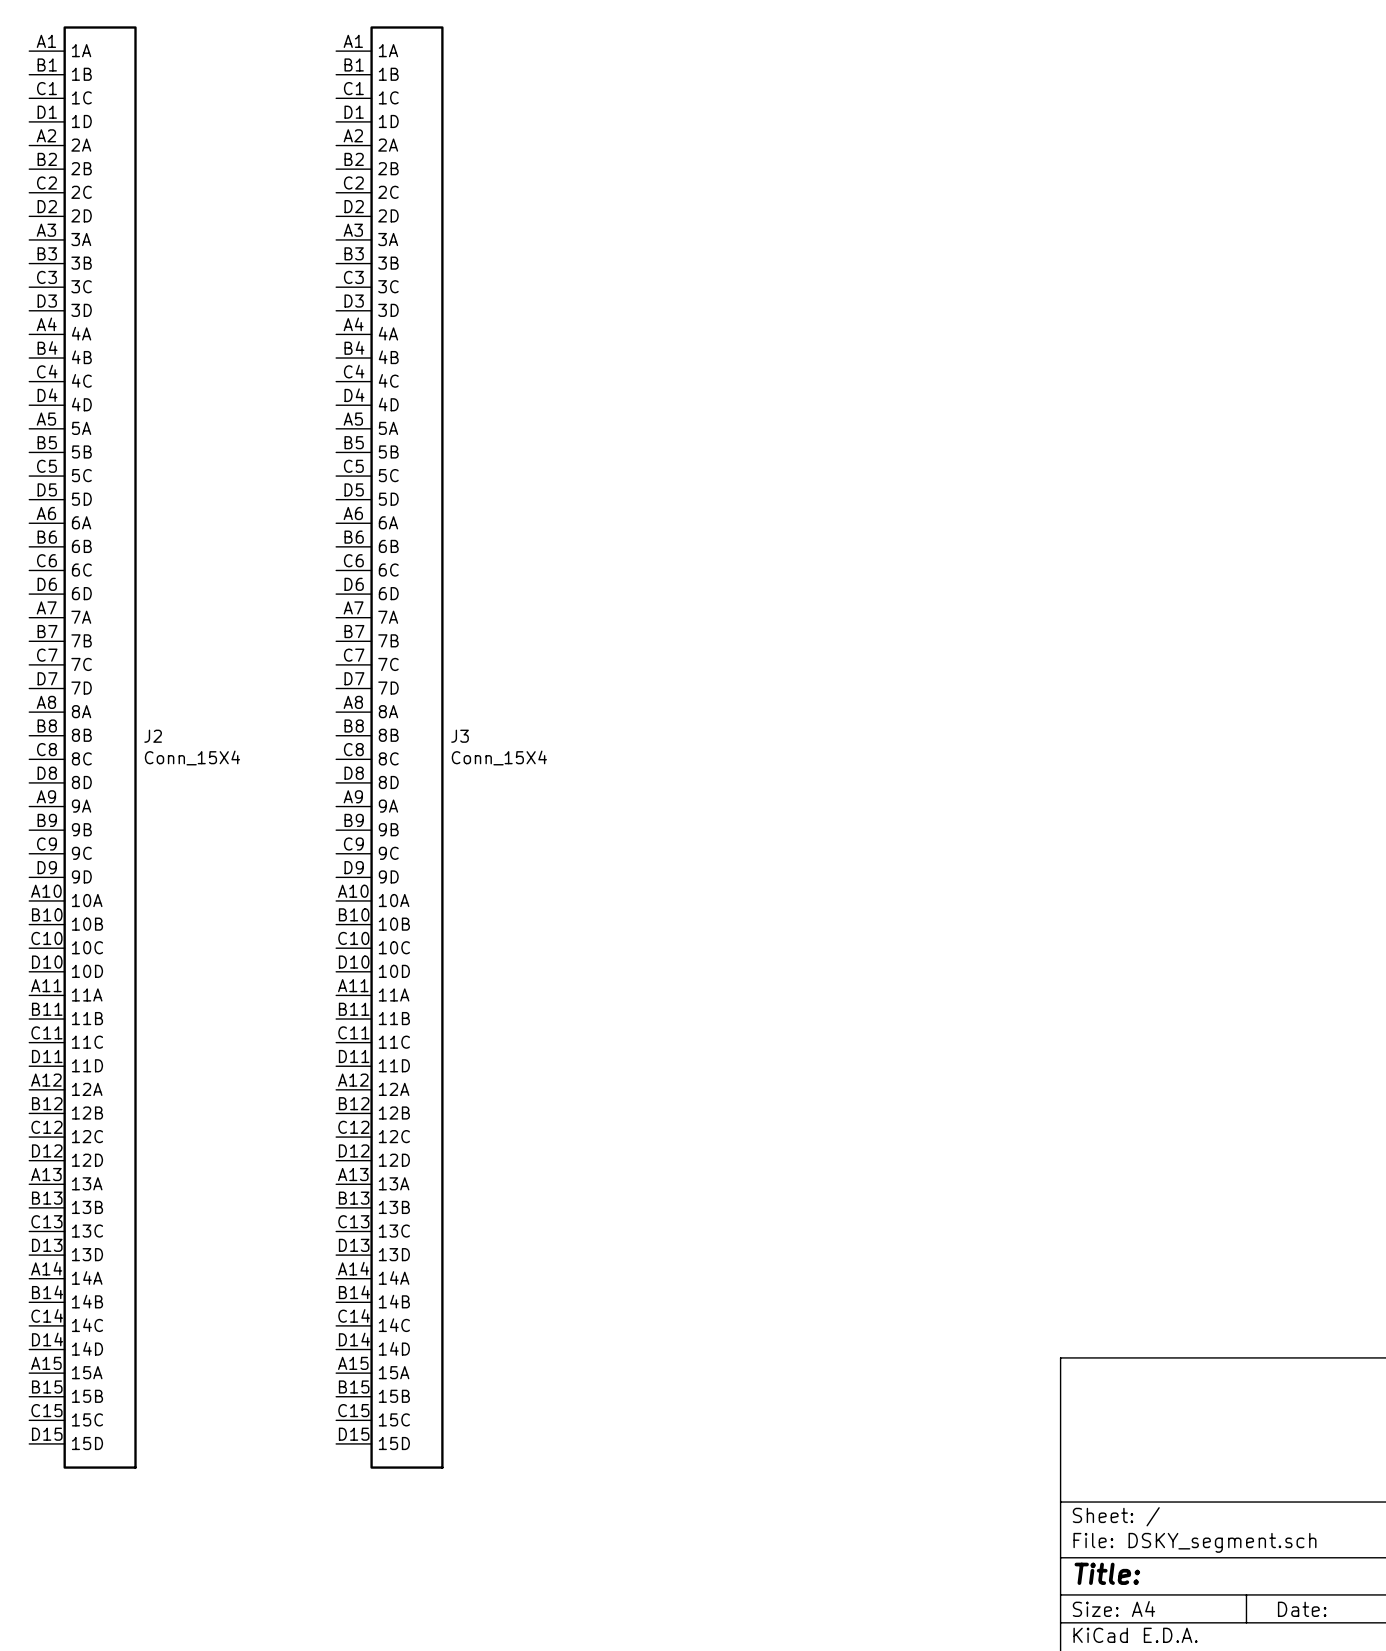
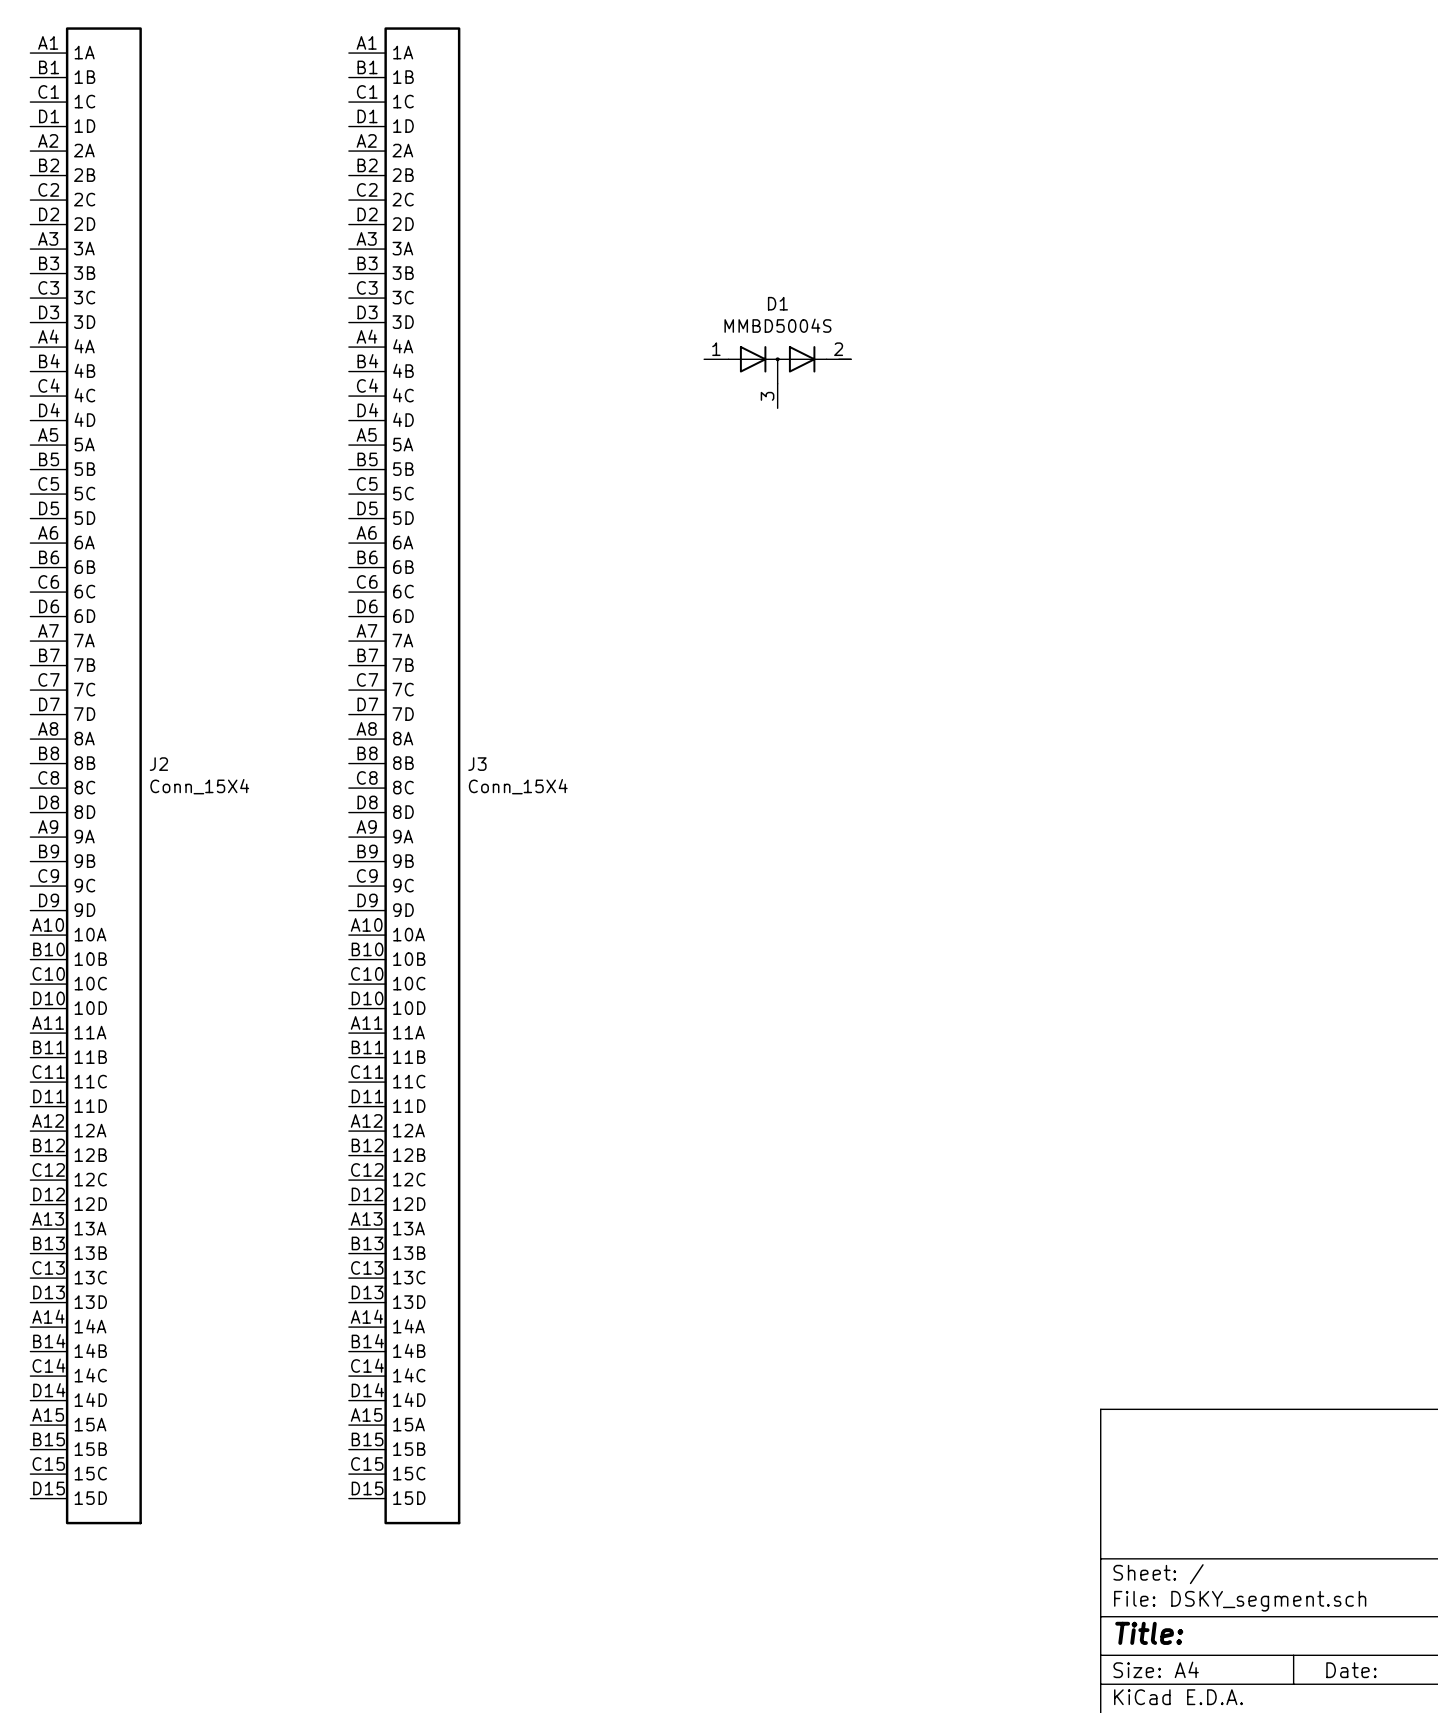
D1: none -> MMBD5004S (777, 377)

